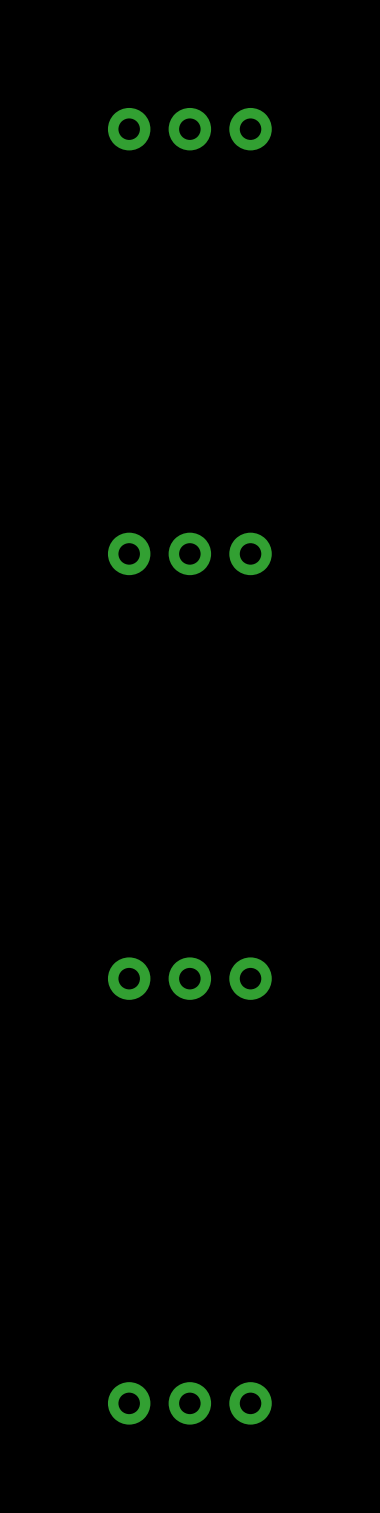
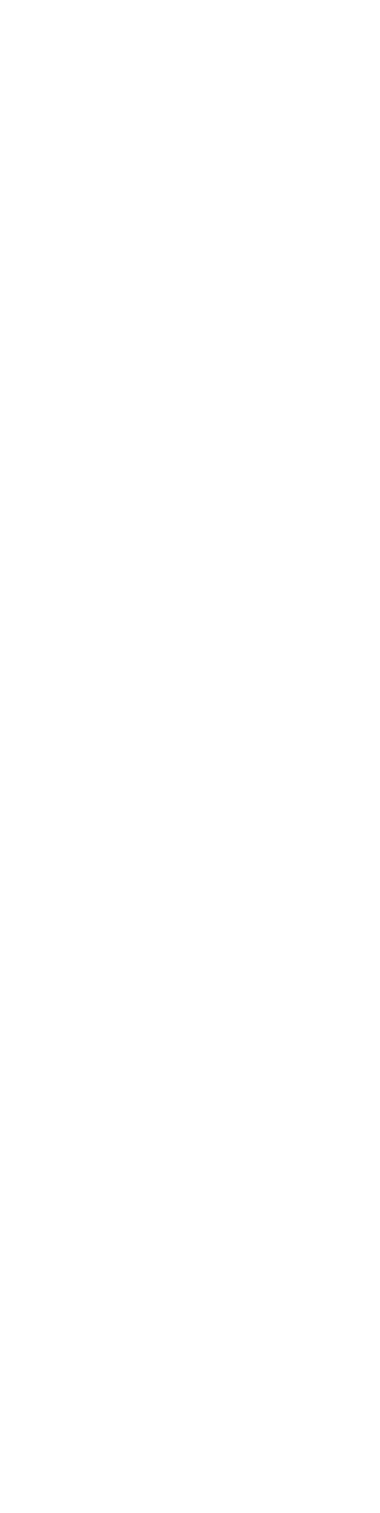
part: (189, 129) -> none
part: (189, 553) -> none
part: (189, 978) -> none
part: (189, 1403) -> none

